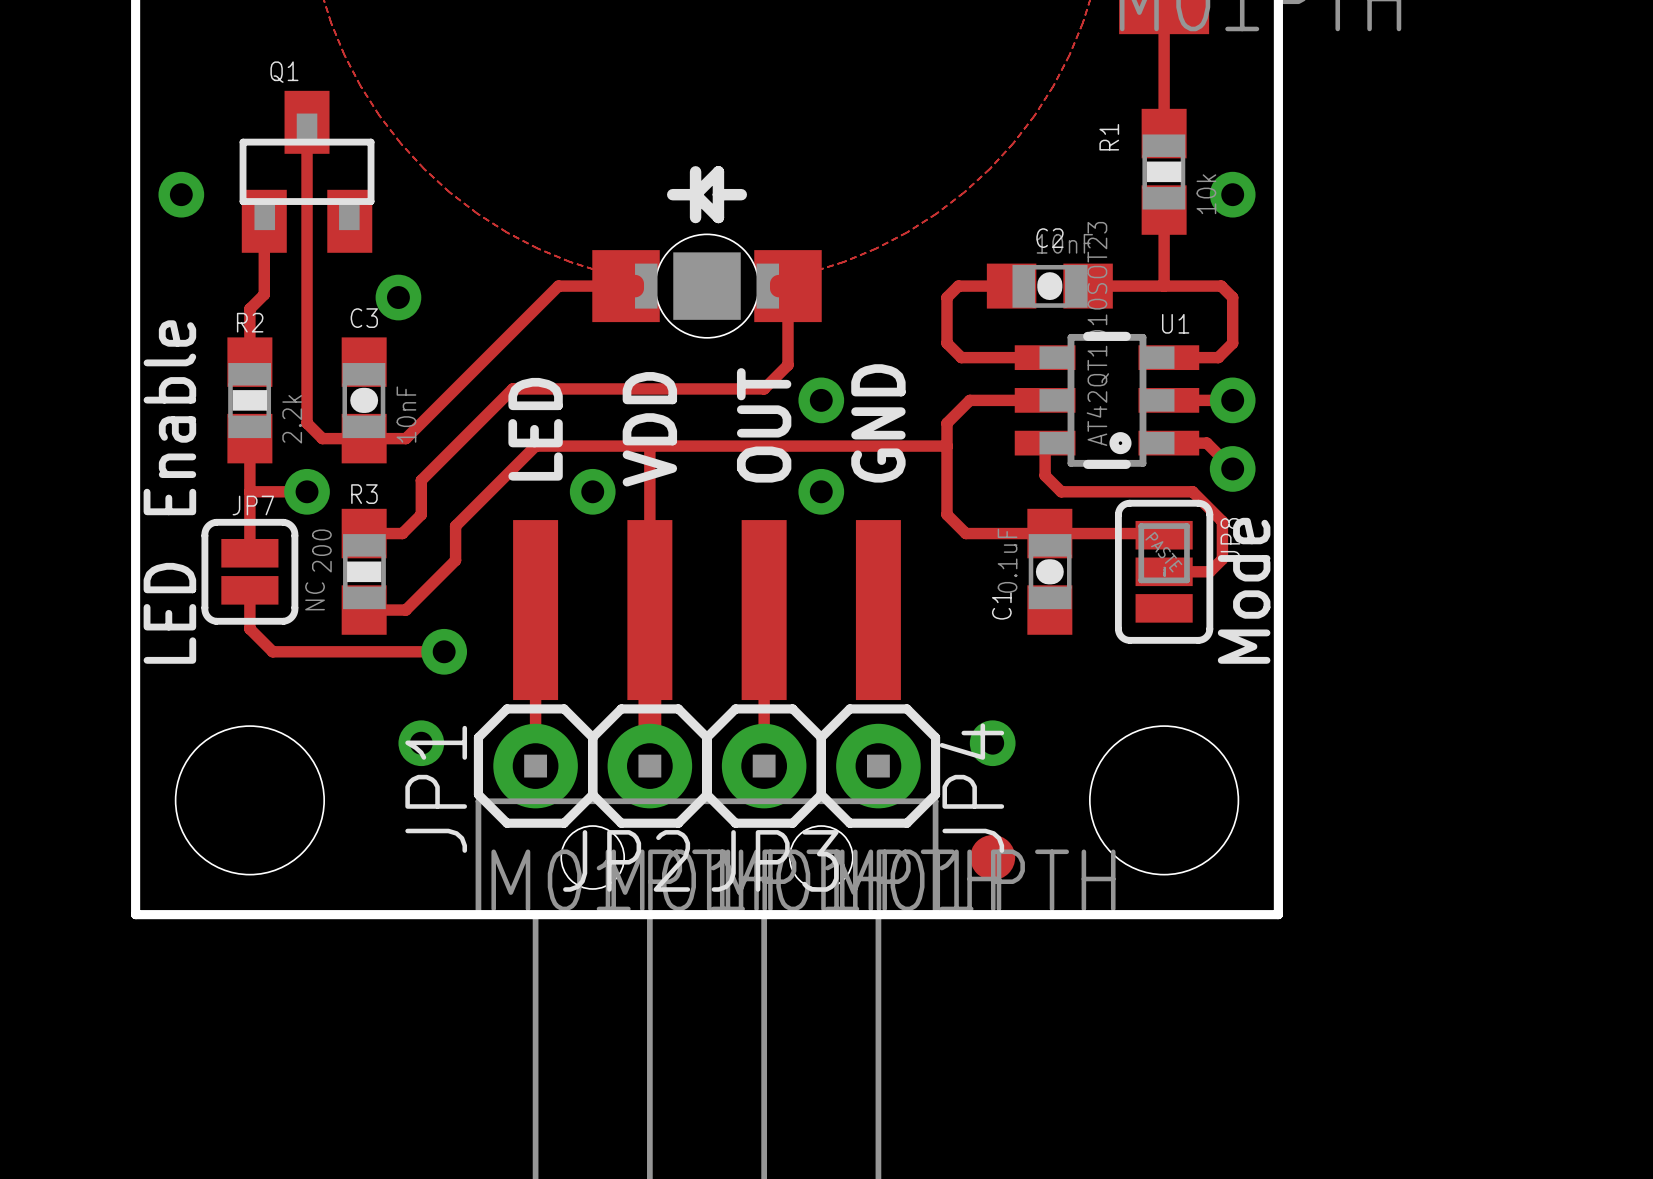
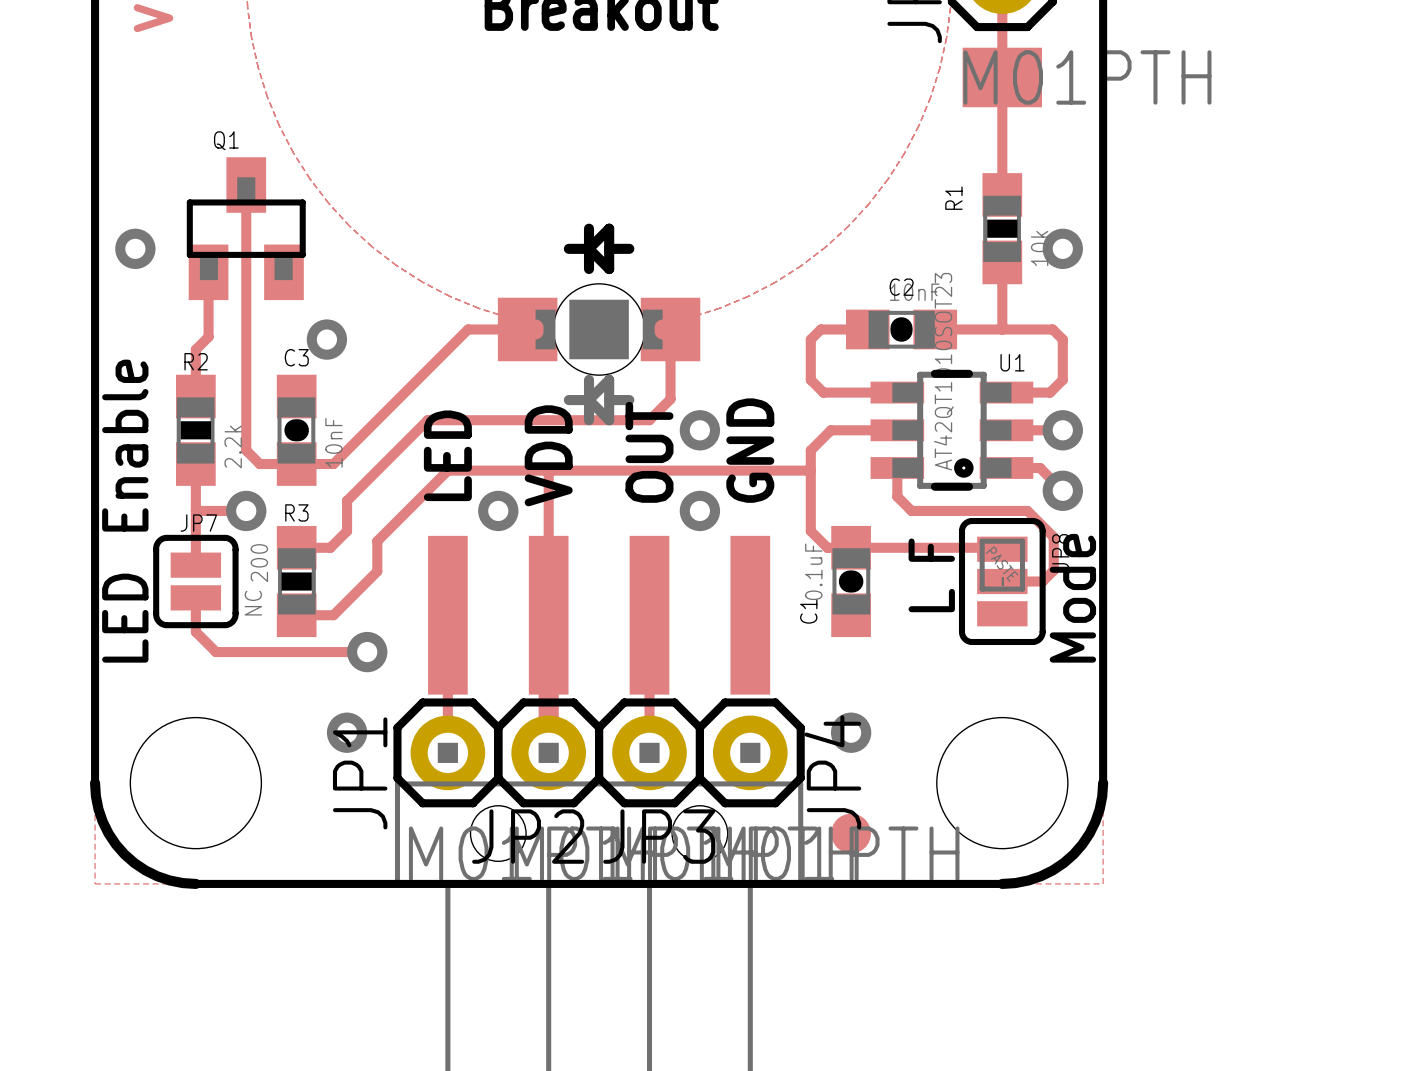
line: none -> (589, 379) (589, 420)
line: none -> (568, 400) (589, 400)
line: none -> (589, 400) (609, 379) (609, 420) (589, 400)
line: none -> (609, 400) (629, 400)
text: none -> F (931, 550)
C1 position: (1049, 571) -> (851, 581)
text: none -> L (931, 600)
board edge: (135, 800) (135, 914) (249, 914) -> (95, 783) (98, 809) (102, 821) (115, 844) (124, 854) (134, 863) (157, 876) (169, 880) (195, 883)
board edge: (1278, 800) (1278, 914) (1164, 914) -> (1103, 783) (1099, 809) (1095, 821) (1082, 844) (1073, 854) (1063, 863) (1040, 876) (1028, 880) (1002, 883)

